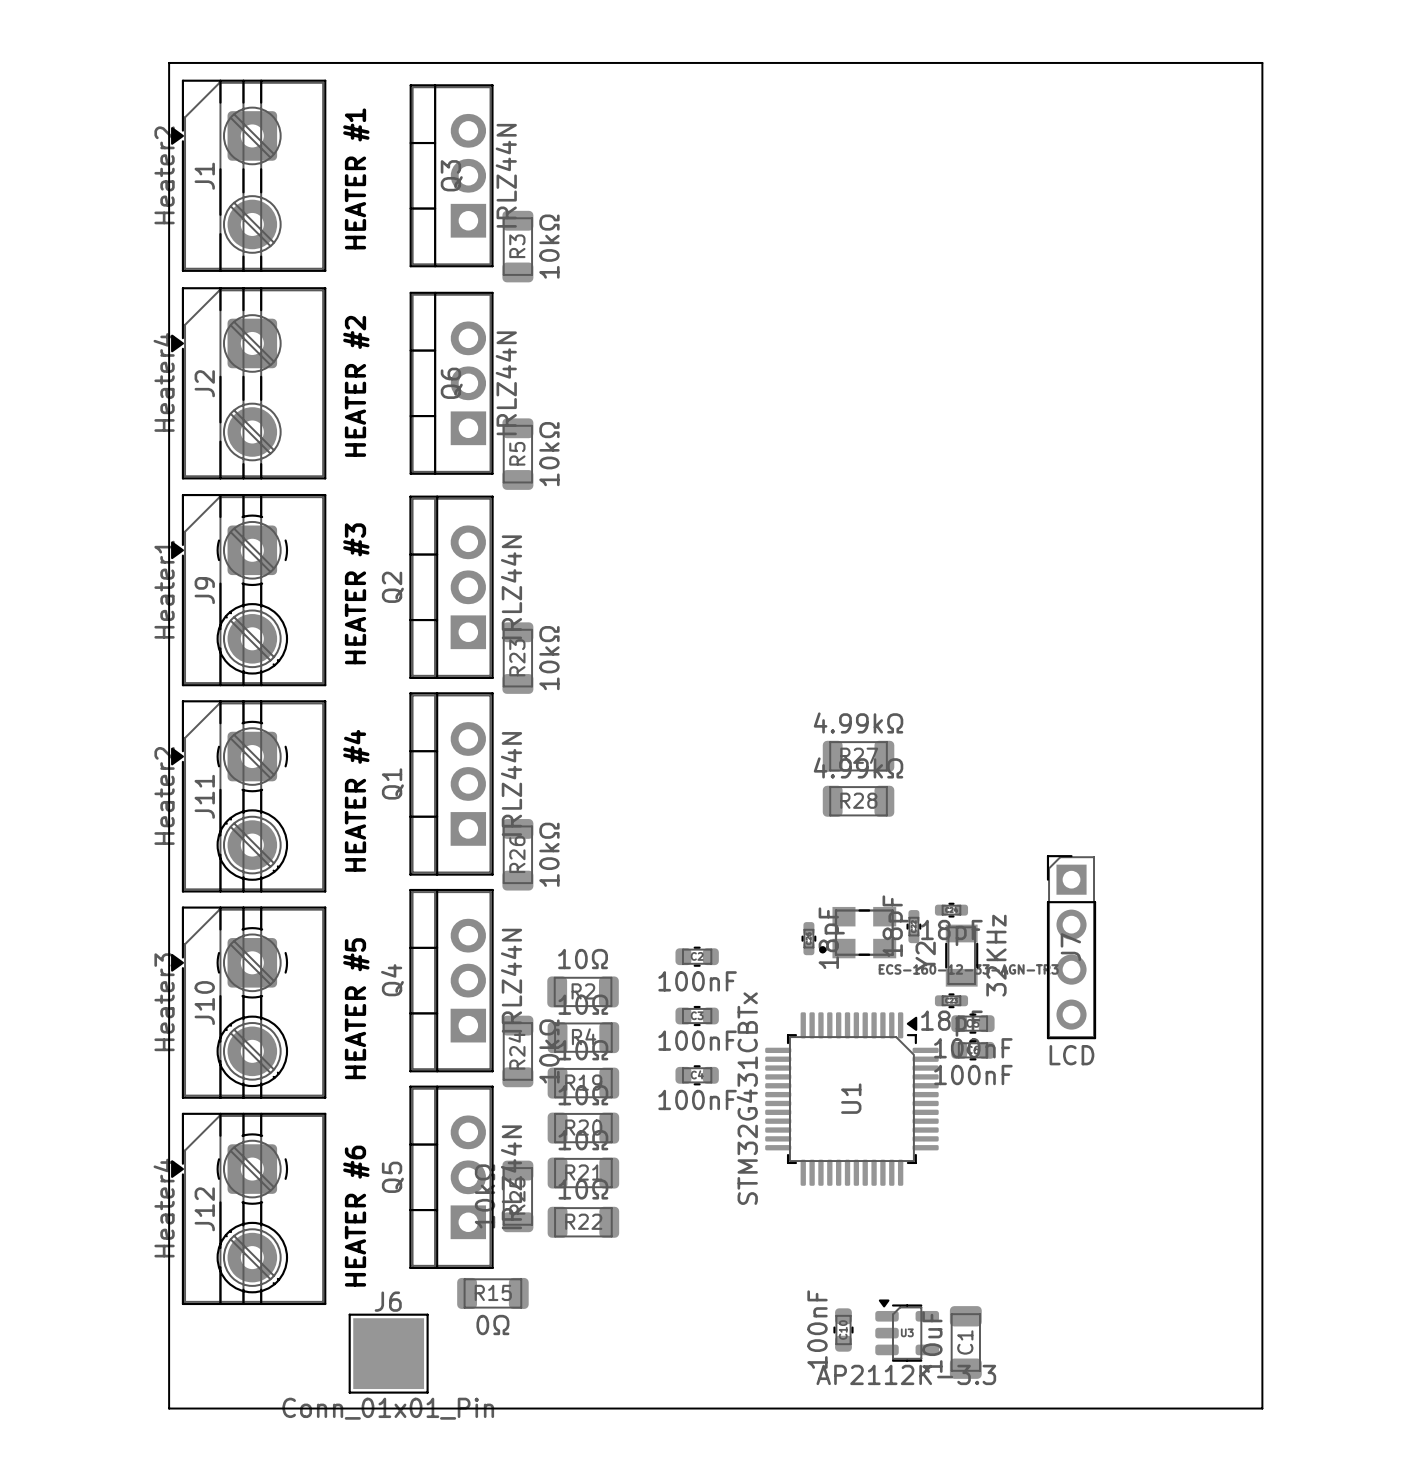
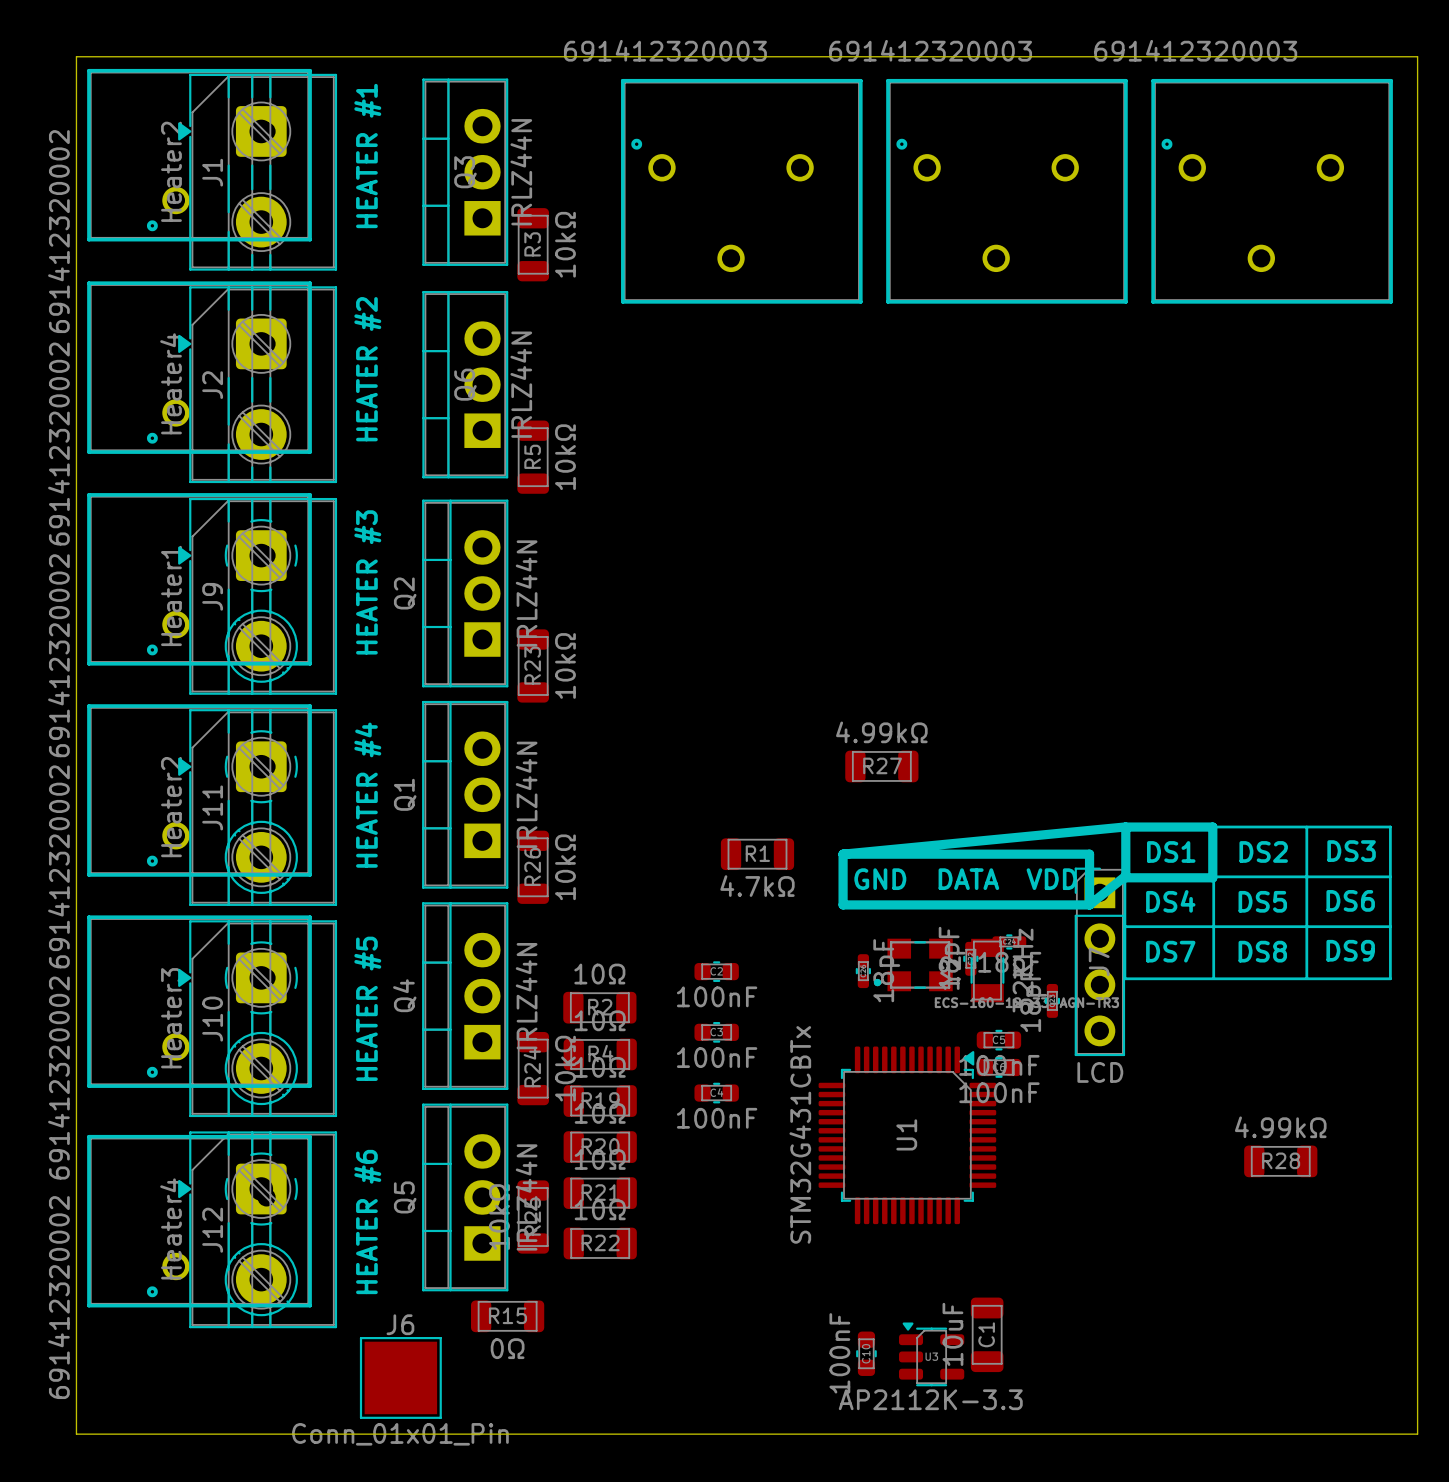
board edge: (169, 62) (169, 1408) -> (176, 56) (76, 56) (76, 1434) (176, 1434)
board edge: (1262, 62) (1262, 1408) -> (1295, 56) (1417, 56) (1417, 1434) (1295, 1434)
part: none -> 691412320002 (199, 155)
text position: HEATER #1 (356, 178) -> HEATER #1 (367, 156)
part: none -> 691412320003 (741, 191)
part: none -> 691412320003 (1006, 191)
part: none -> 691412320003 (1272, 191)
part: none -> 691412320002 (199, 367)
text position: HEATER #2 (356, 386) -> HEATER #2 (367, 369)
part: none -> 691412320002 (199, 579)
text position: HEATER #3 (356, 593) -> HEATER #3 (367, 582)
part: none -> 691412320002 (199, 790)
text position: HEATER #4 (356, 800) -> HEATER #4 (367, 795)
R28 position: (858, 801) -> (1280, 1161)
line: none -> (1124, 827) (843, 854)
line: none -> (1124, 827) (1390, 827) (1390, 978) (1124, 978) (1124, 827)
line: none -> (1125, 827) (1212, 827) (1212, 877) (1125, 877) (1125, 827)
line: none -> (1213, 827) (1213, 978)
line: none -> (1306, 827) (1306, 978)
text: none -> DS3 (1351, 851)
text: none -> DS1 (1171, 851)
text: none -> DS2 (1263, 851)
R1: none -> 4.7kΩ (757, 854)
line: none -> (843, 854) (843, 904) (1089, 904)
line: none -> (843, 854) (1089, 854) (1089, 904)
line: none -> (1125, 875) (1089, 904)
line: none -> (1124, 876) (1390, 876)
text: none -> GND (880, 879)
text: none -> DATA (968, 879)
text: none -> VDD (1051, 879)
text: none -> DS6 (1350, 900)
text: none -> DS4 (1170, 901)
text: none -> DS5 (1262, 901)
part position: (951, 910) -> (1009, 941)
line: none -> (1124, 926) (1390, 926)
part position: (913, 926) -> (970, 958)
part position: (857, 932) -> (913, 964)
text: none -> DS9 (1350, 950)
text: none -> DS7 (1170, 951)
text: none -> DS8 (1262, 951)
part position: (808, 938) -> (863, 971)
part: none -> 691412320002 (199, 1001)
part rotation: 0° (951, 1000) -> 90° clockwise (1052, 1000)
part position: (951, 1000) -> (1052, 1000)
text position: HEATER #5 (356, 1008) -> HEATER #5 (367, 1008)
U1 position: (851, 1099) -> (907, 1135)
part: none -> 691412320002 (199, 1221)
text position: HEATER #6 (356, 1216) -> HEATER #6 (367, 1221)
C1 position: (965, 1342) -> (987, 1334)

